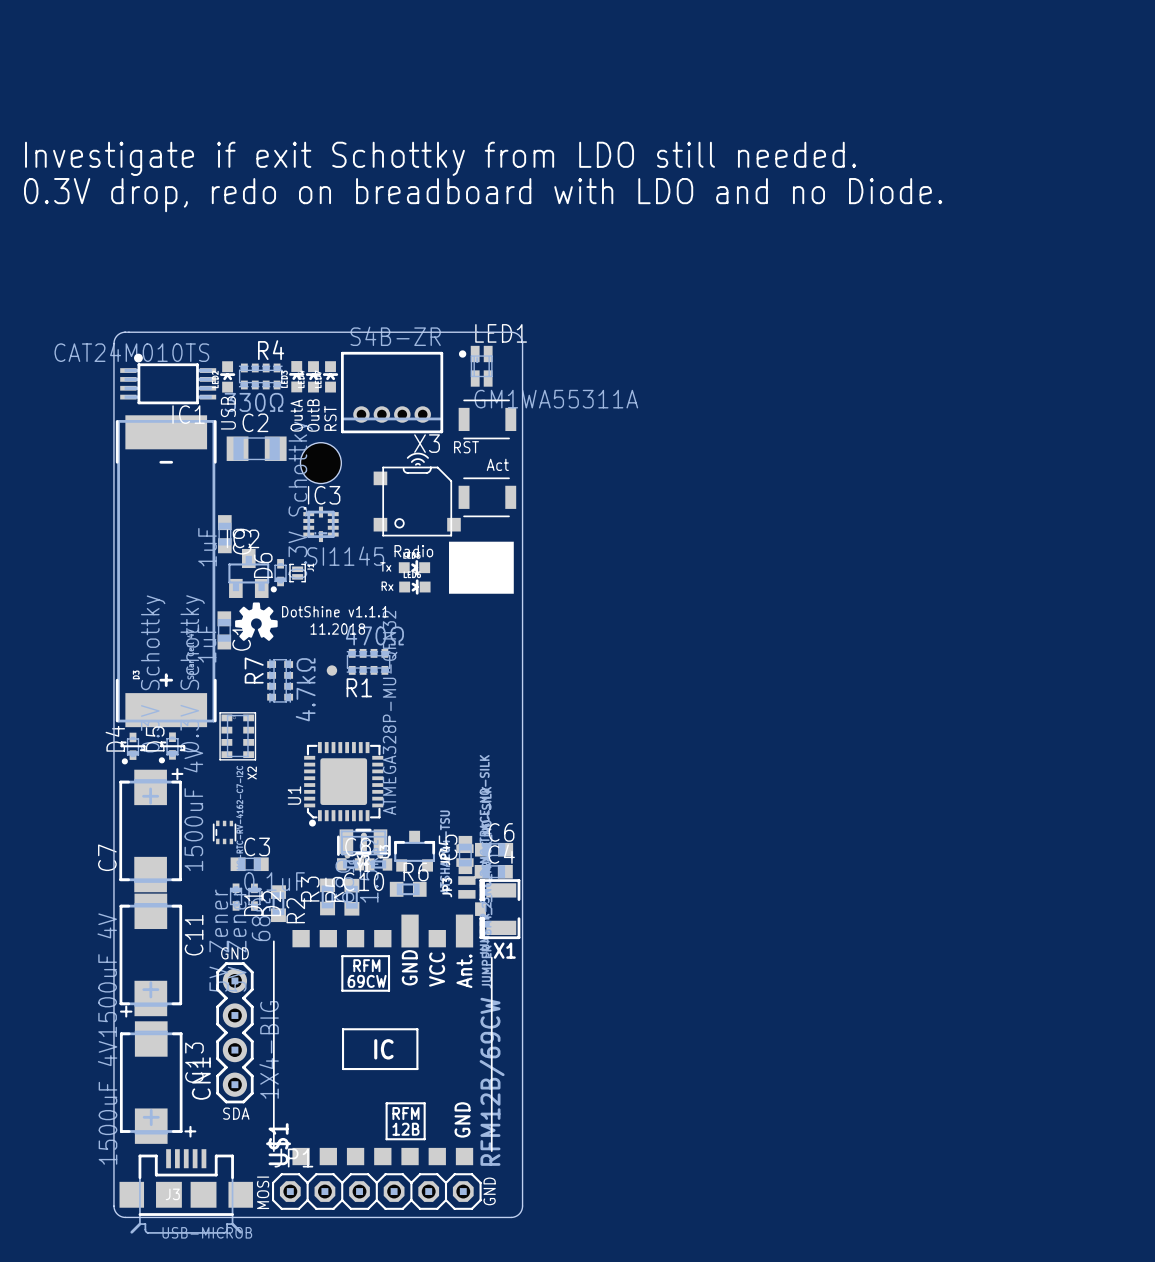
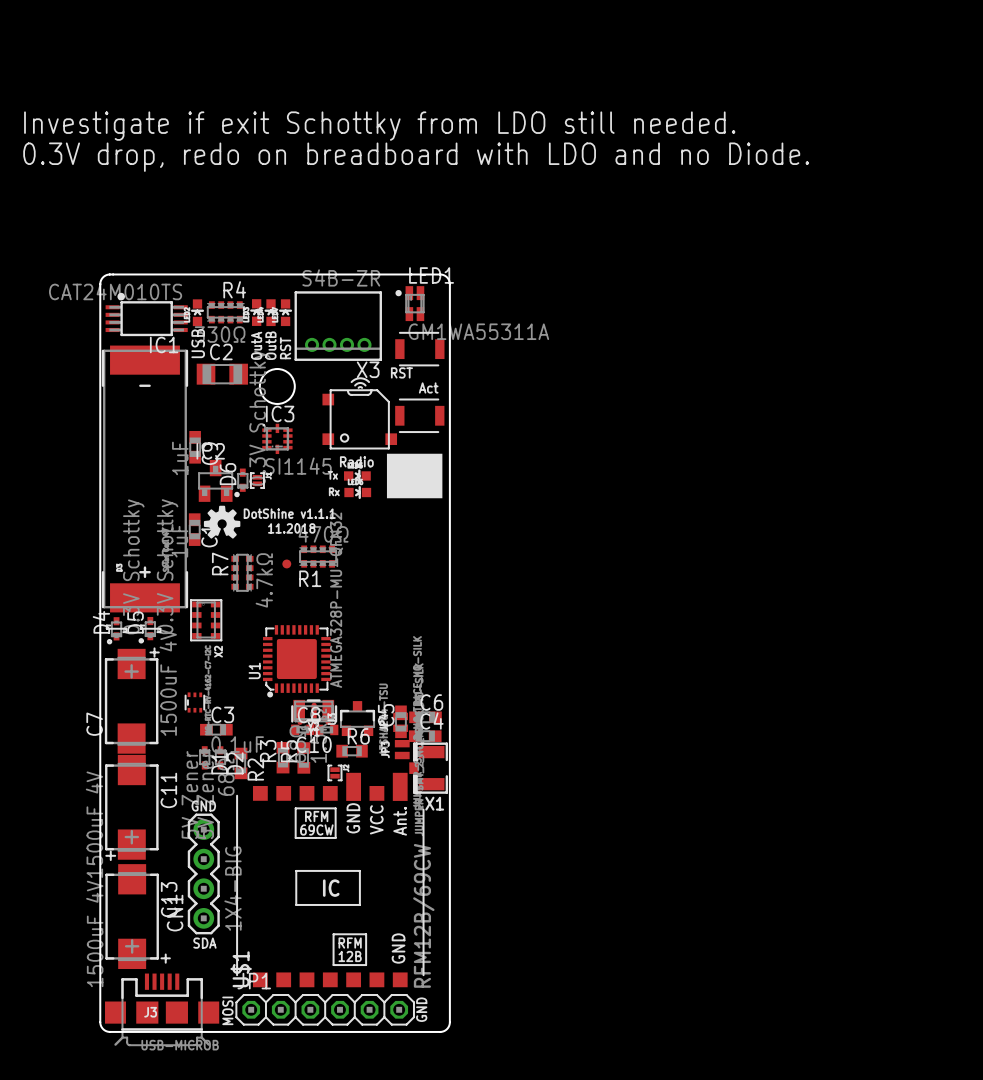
part: none -> (334, 772)

